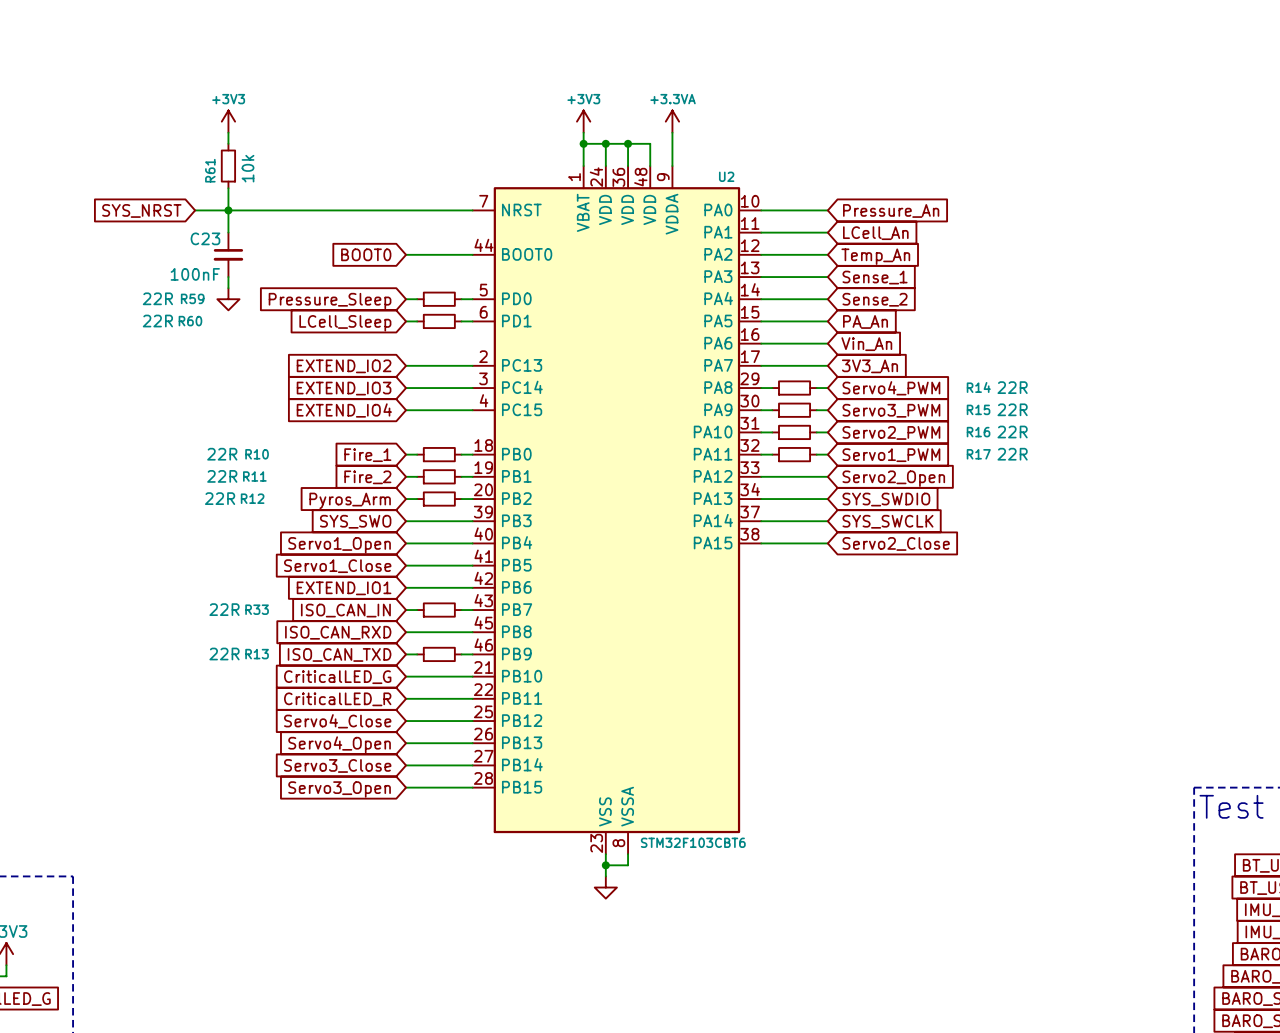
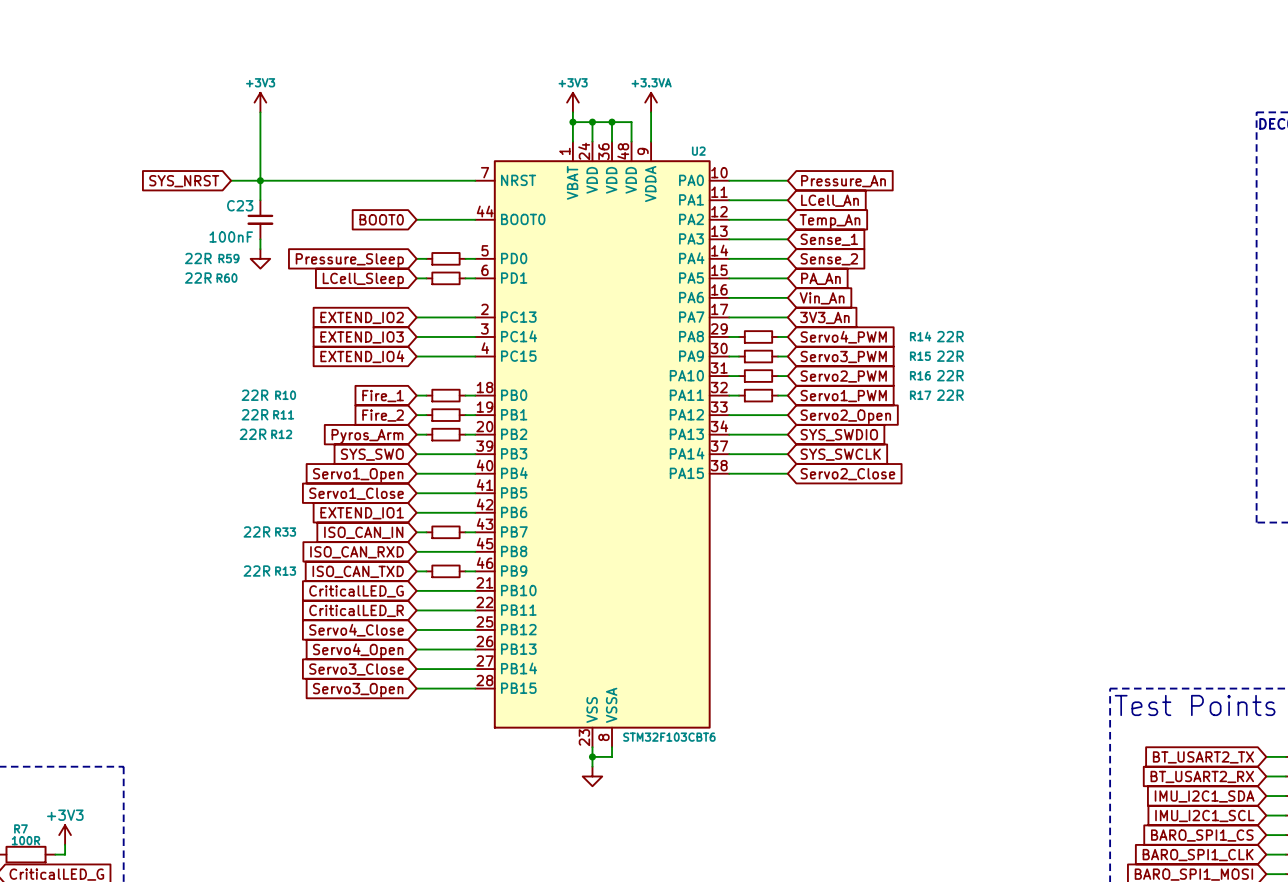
wire: none -> (260, 122) (260, 161)
R61: 10k (228, 166) -> none

